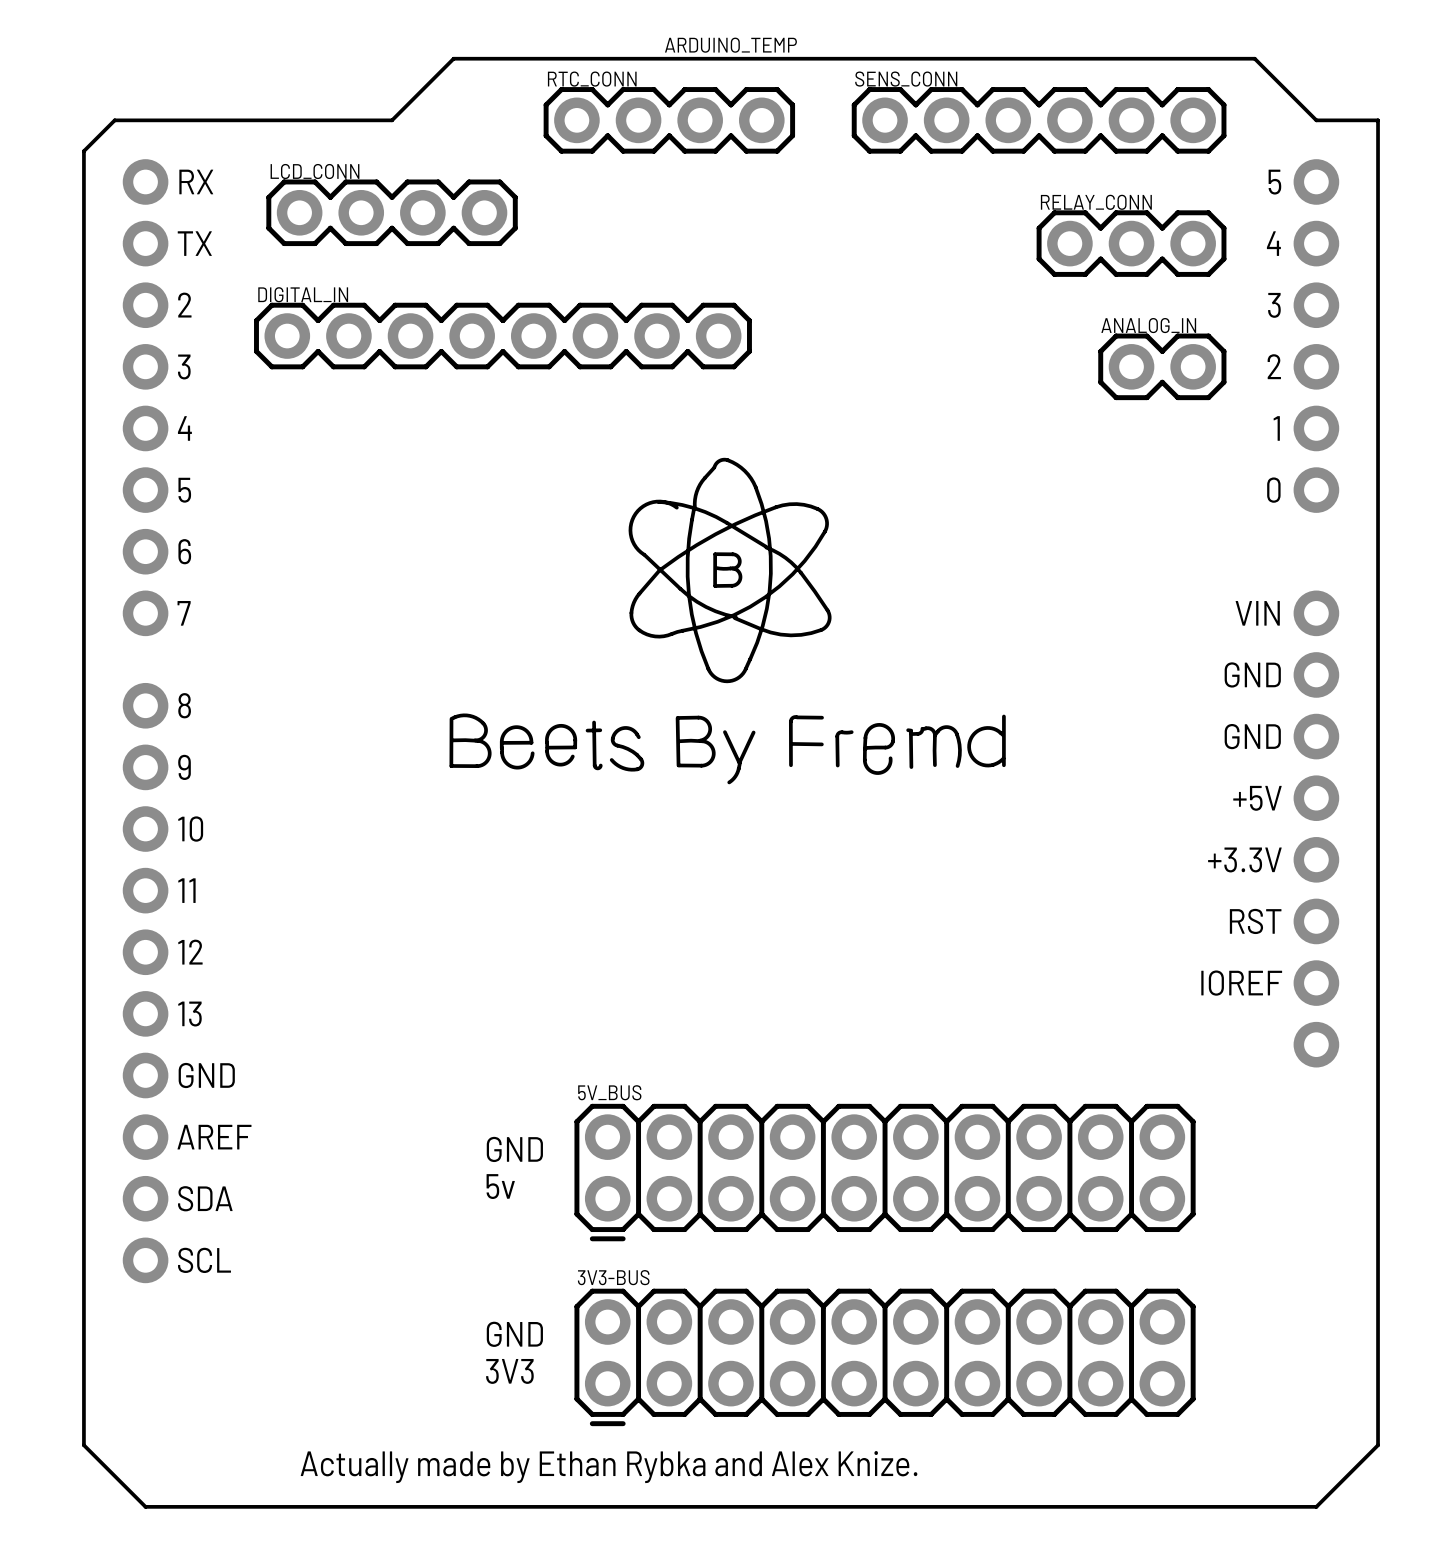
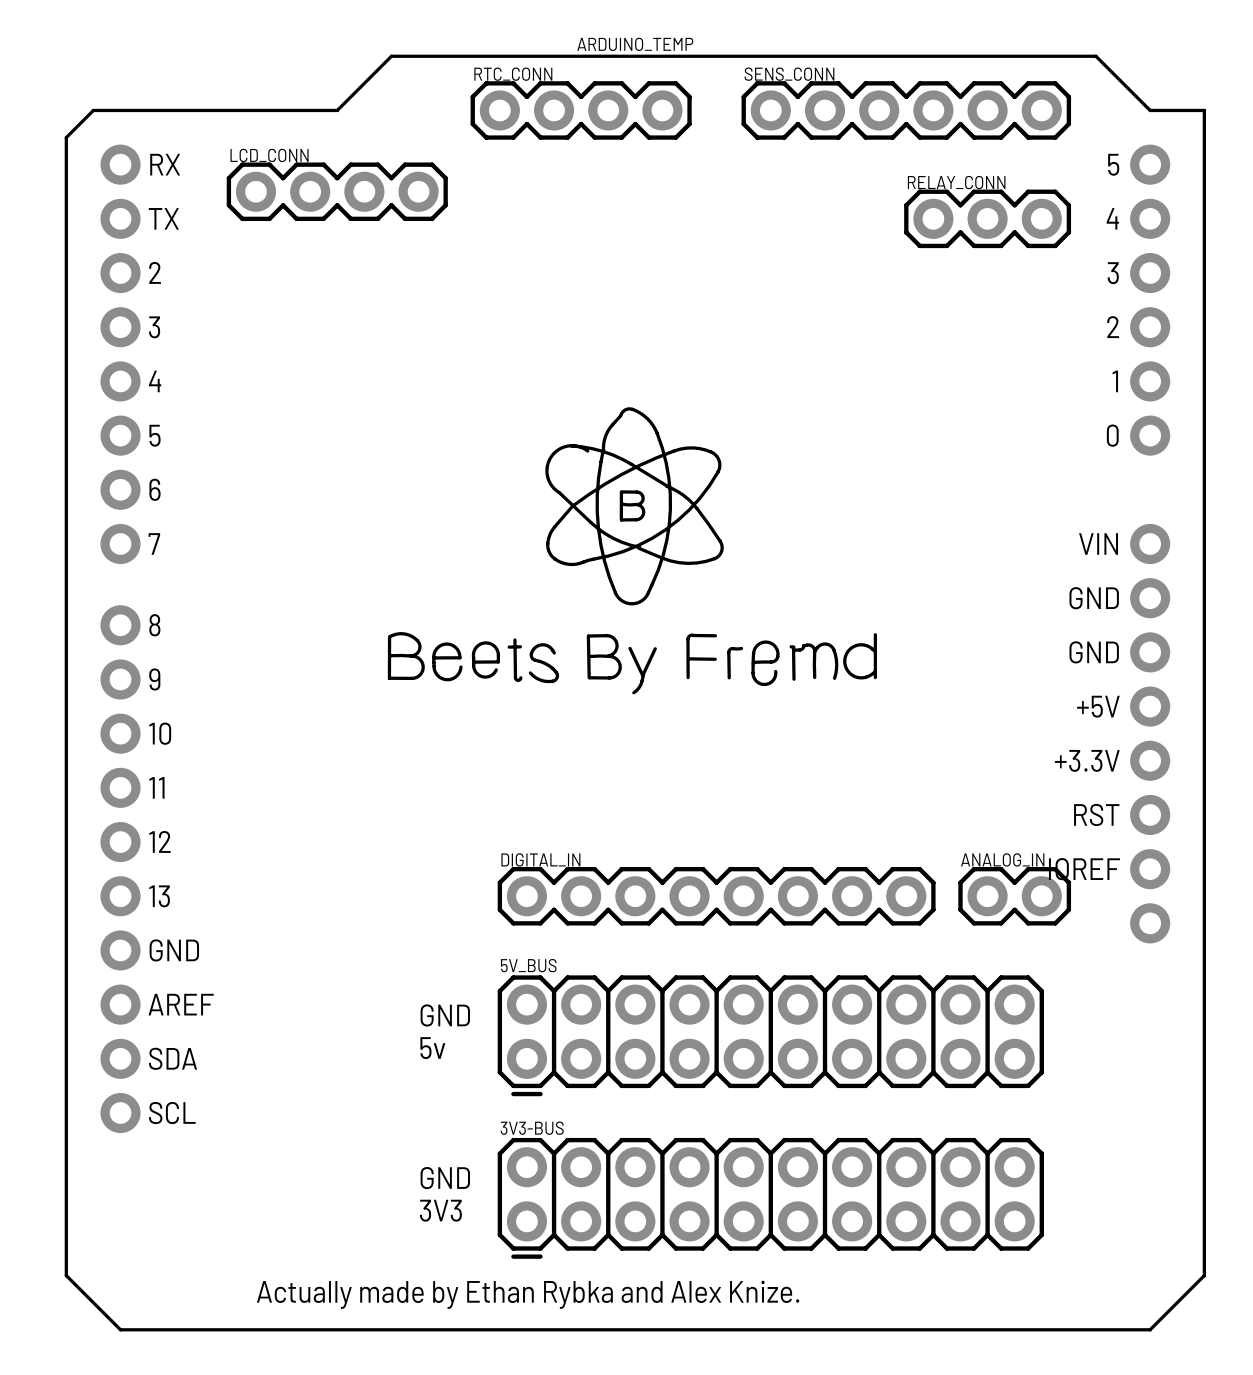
DIGITAL_IN: (502, 336) -> none
ANALOG_IN: (1162, 366) -> none
DIGITAL_IN: none -> (716, 896)
ANALOG_IN: none -> (1014, 896)

